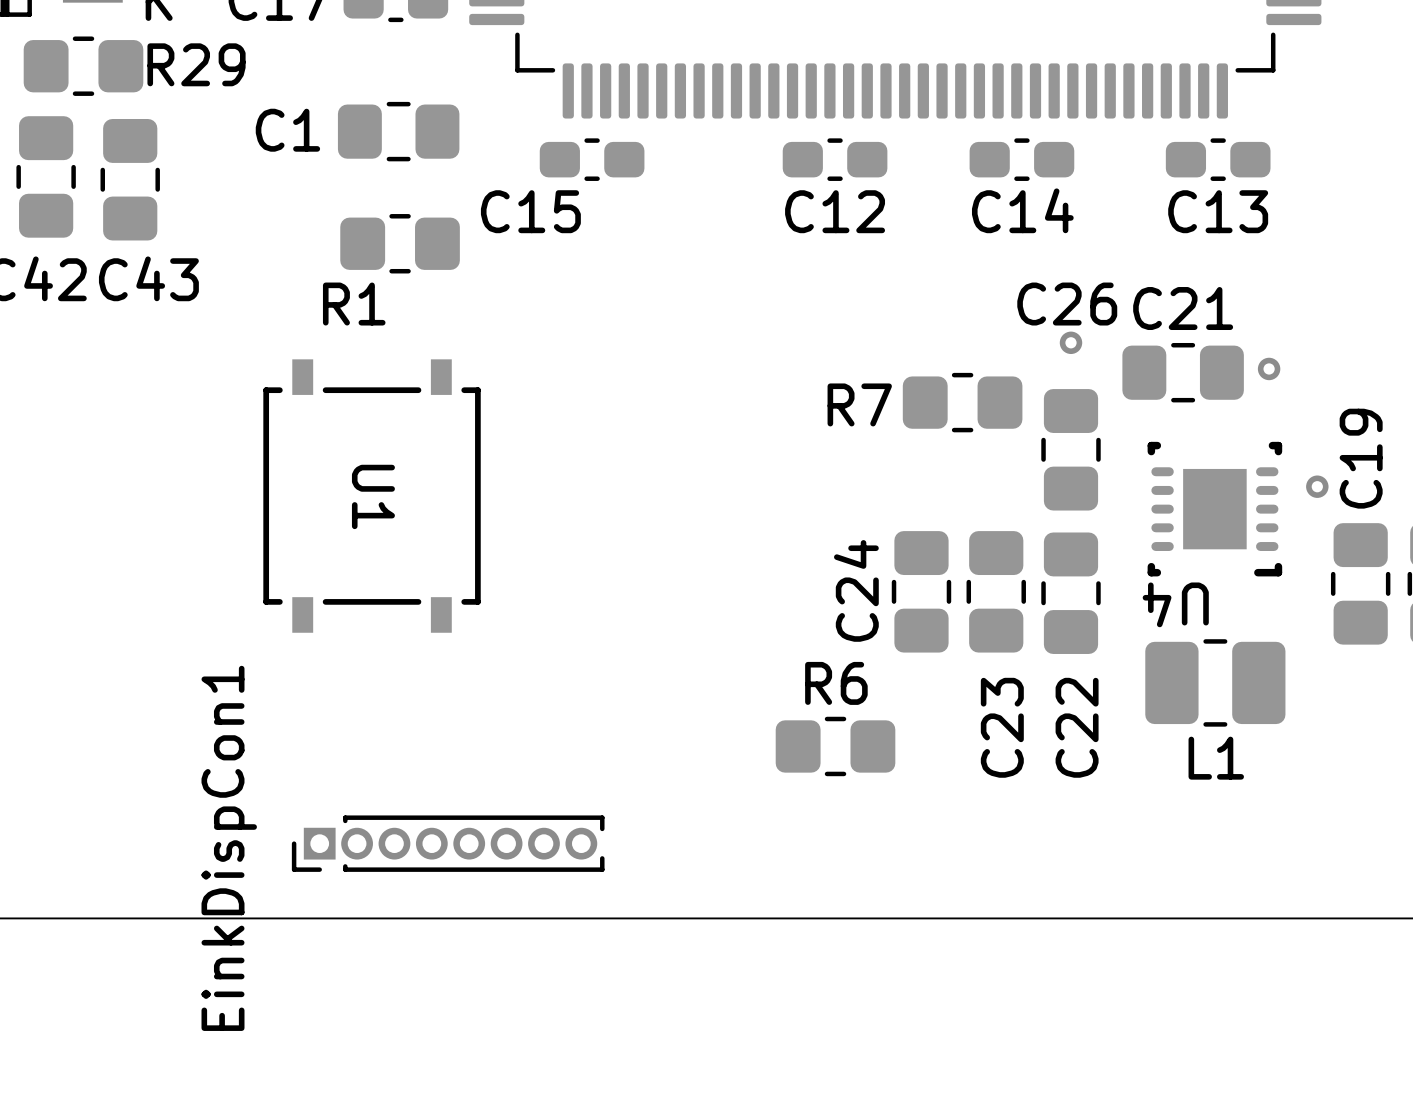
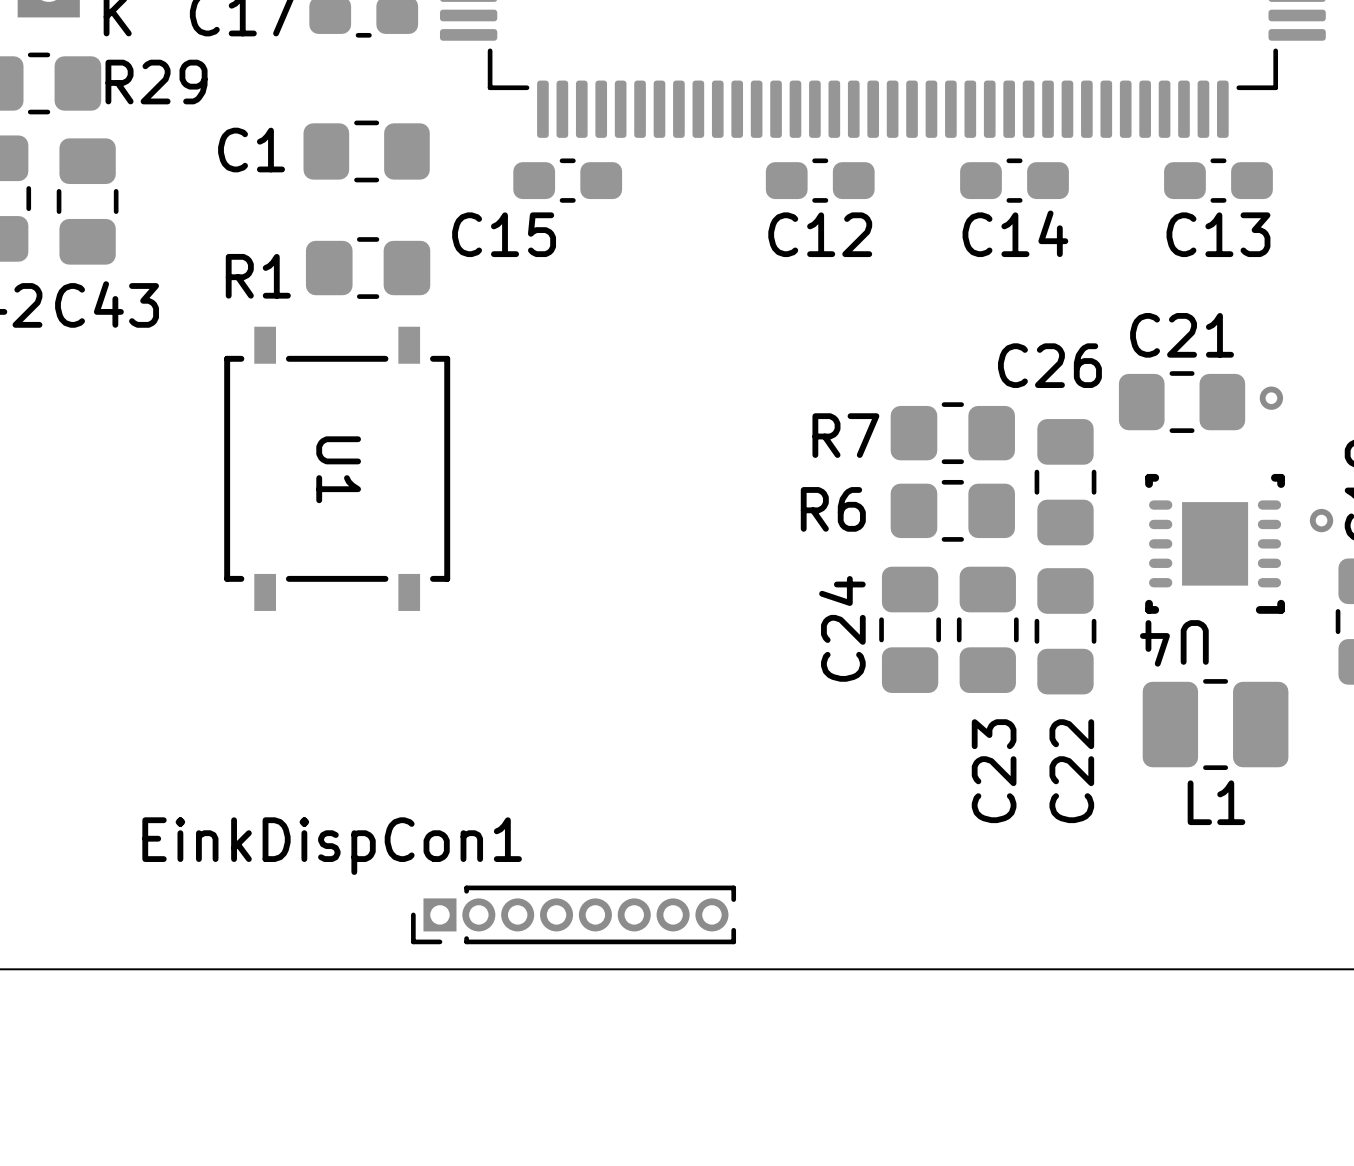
R1 name position: R1 (354, 304) -> R1 (258, 276)
C26 name position: C26 (1067, 304) -> C26 (1049, 365)
part: (1070, 342) -> none
U1 position: (372, 496) -> (337, 468)
R6 name position: R6 (836, 683) -> R6 (833, 509)
R6 position: (835, 746) -> (952, 510)
EinkDispCon1 position: (448, 843) -> (573, 914)
EinkDispCon1 name rotation: 0° (229, 848) -> 90° clockwise (332, 846)

